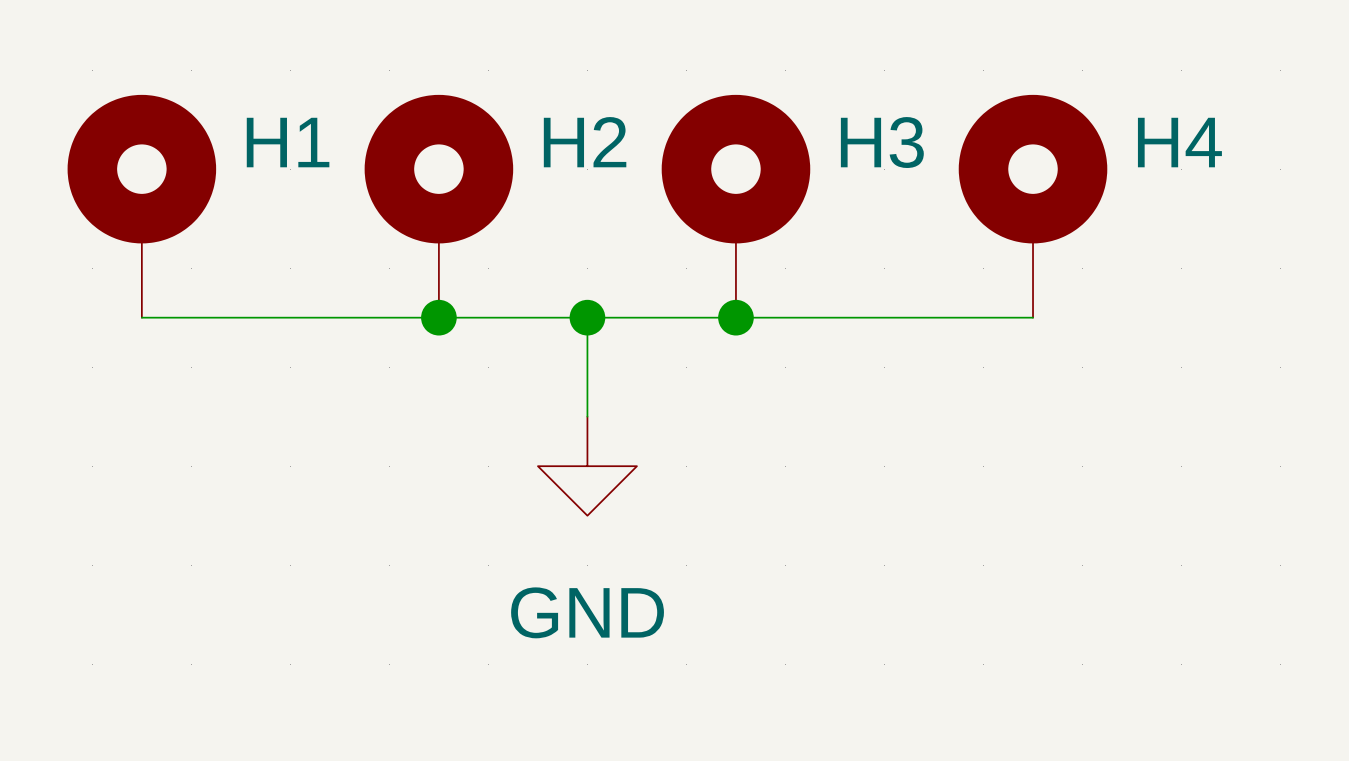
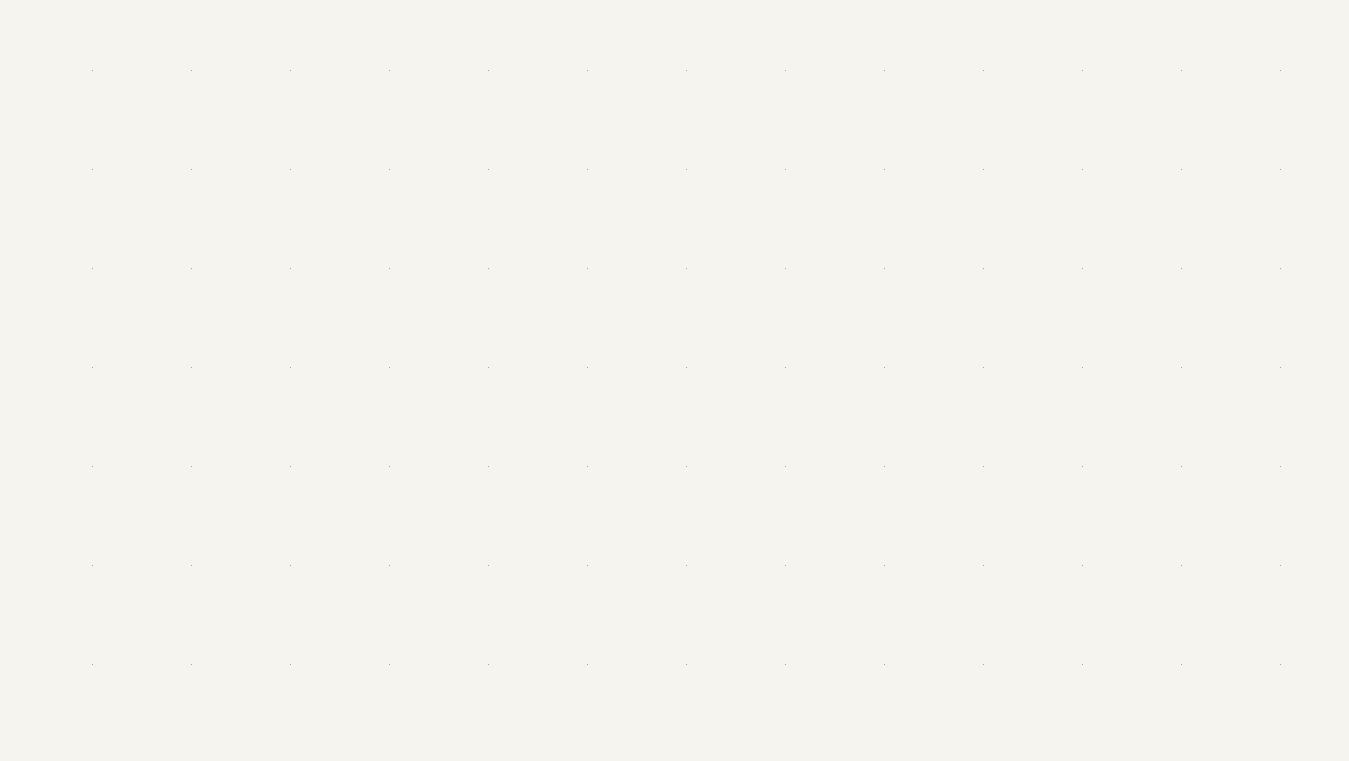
H1: (141, 206) -> none
H2: (438, 206) -> none
H3: (735, 206) -> none
H4: (1033, 206) -> none
wire: (141, 317) (1033, 317) -> none
junction: (438, 317) -> none
wire: (587, 317) (587, 416) -> none
junction: (587, 317) -> none
junction: (735, 317) -> none
power symbol: GND (587, 466) -> none

